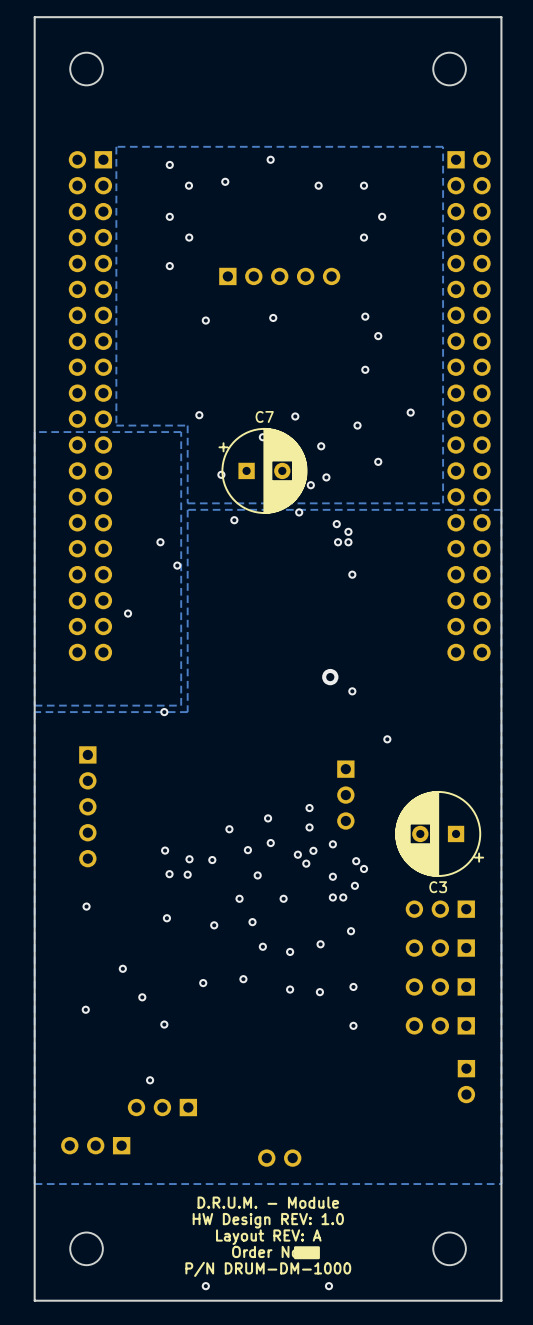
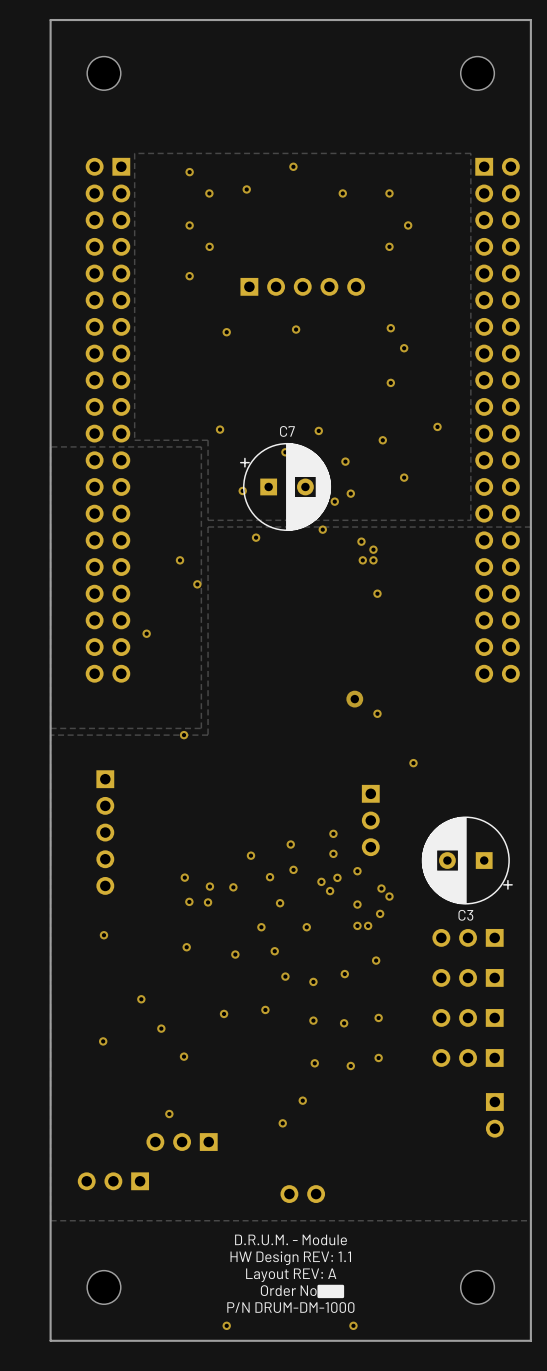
via: none -> (314, 1063)
via: none -> (350, 1065)
via: none -> (302, 1100)
via: none -> (282, 1123)
text: HW Design REV: 1.0 (268, 1220) -> HW Design REV: 1.1 (290, 1258)

